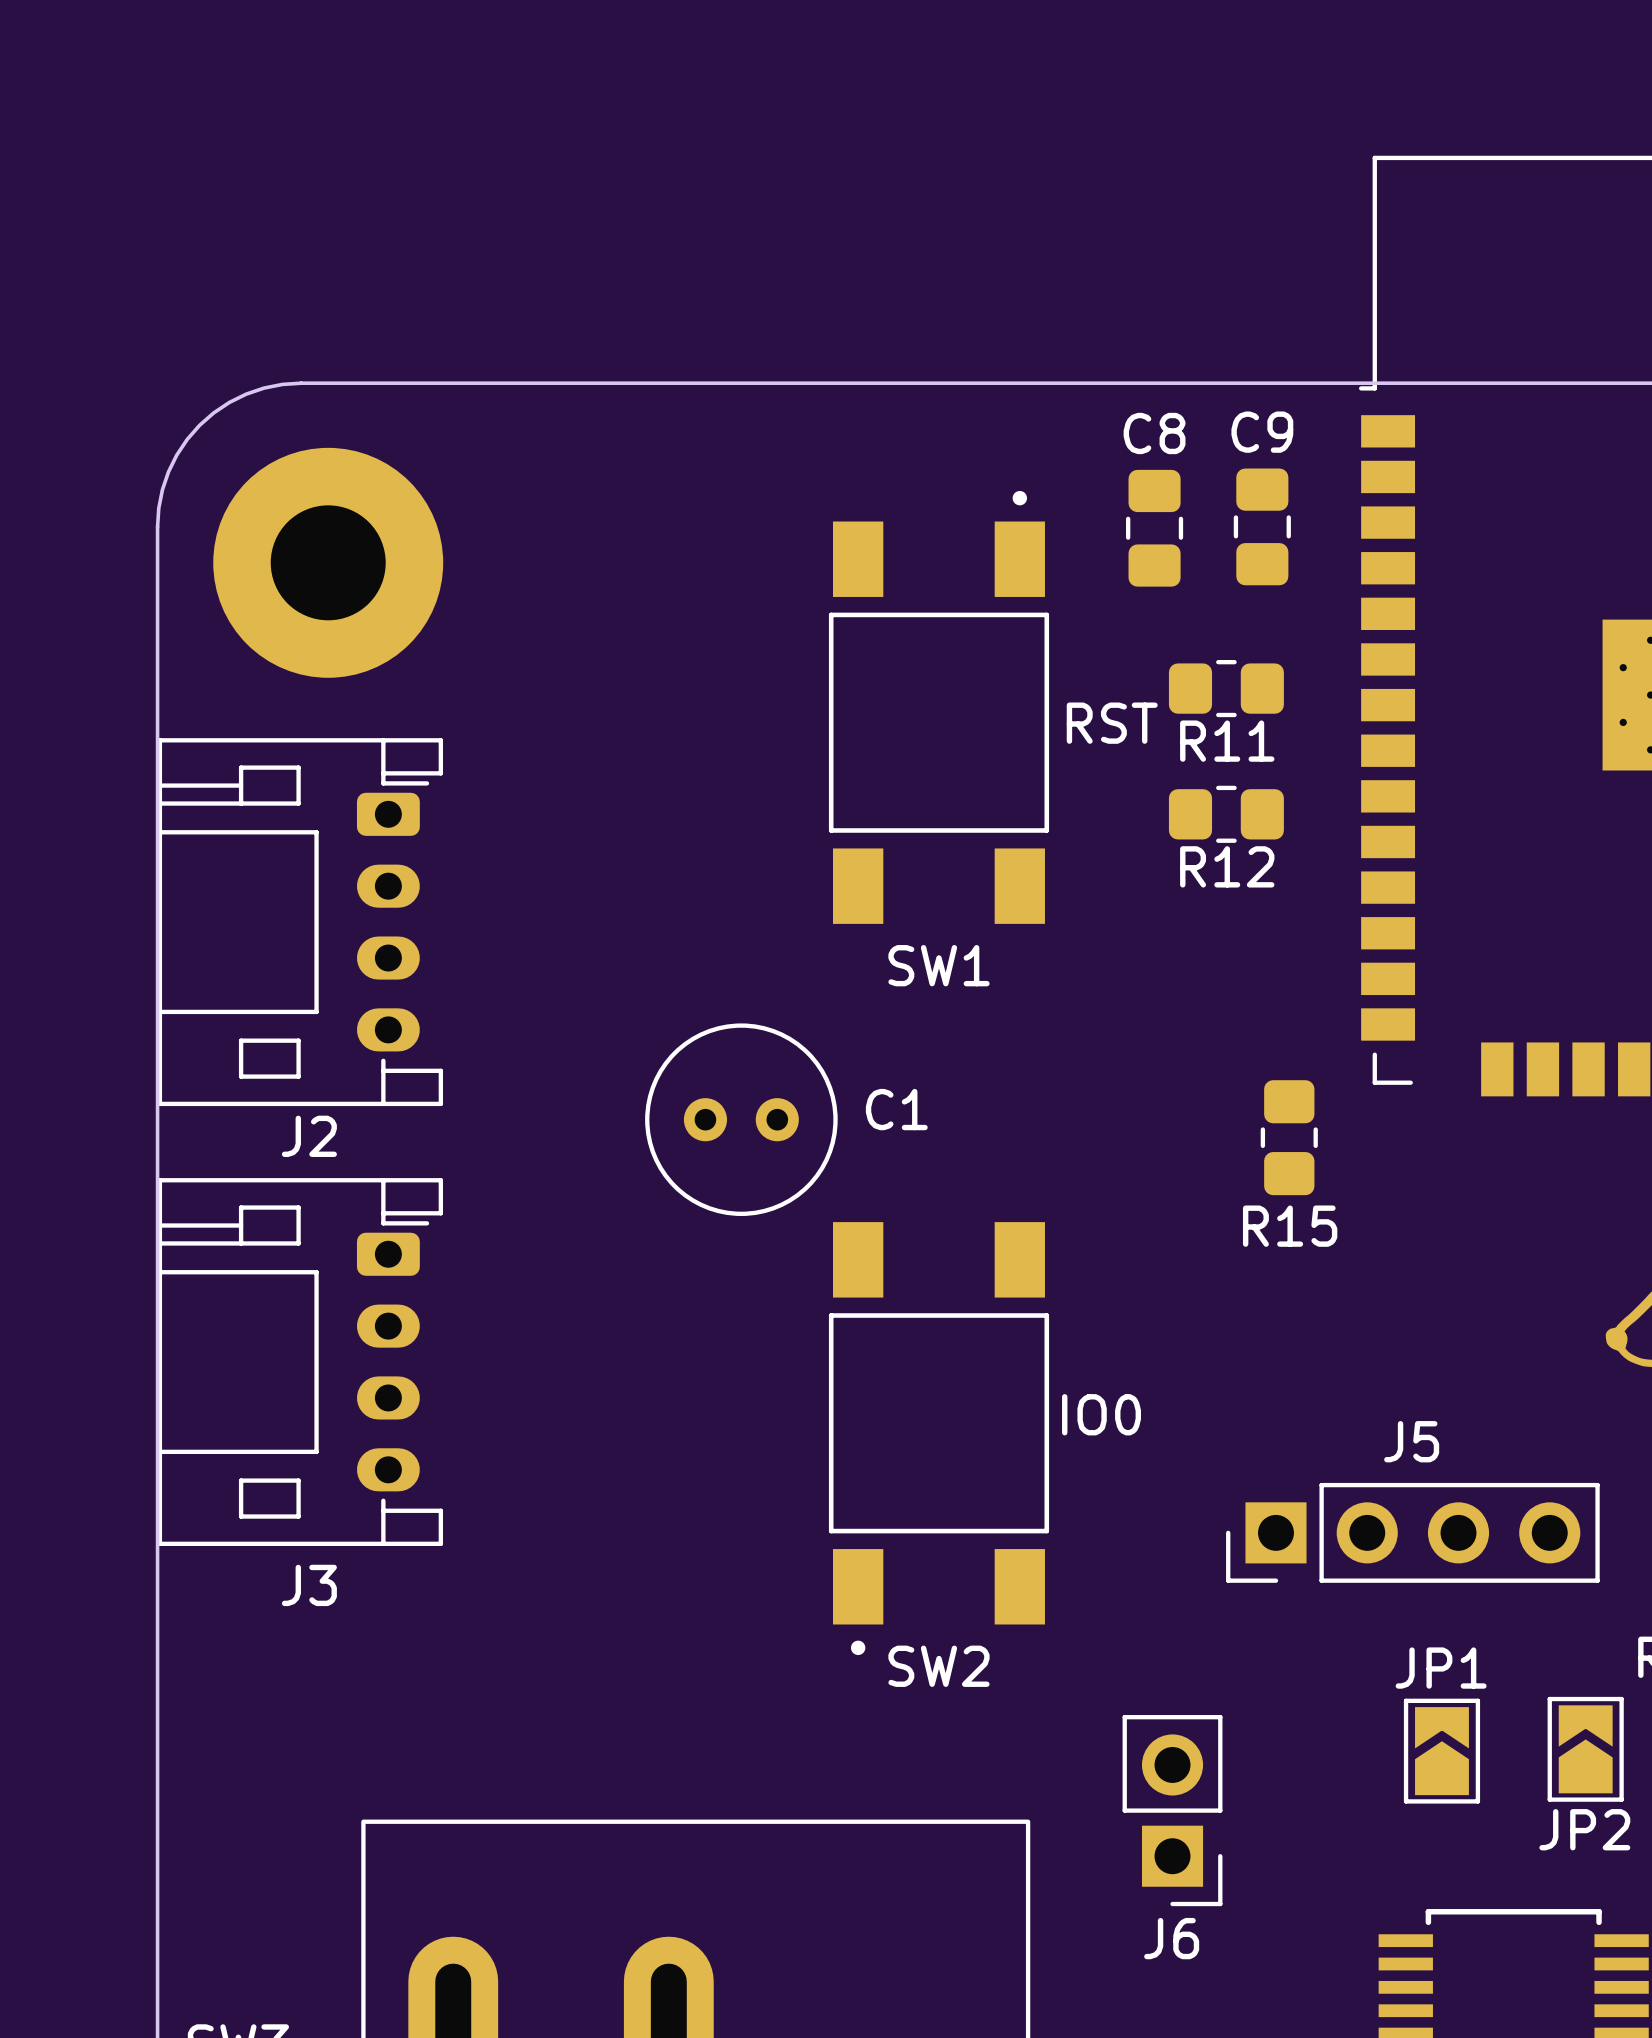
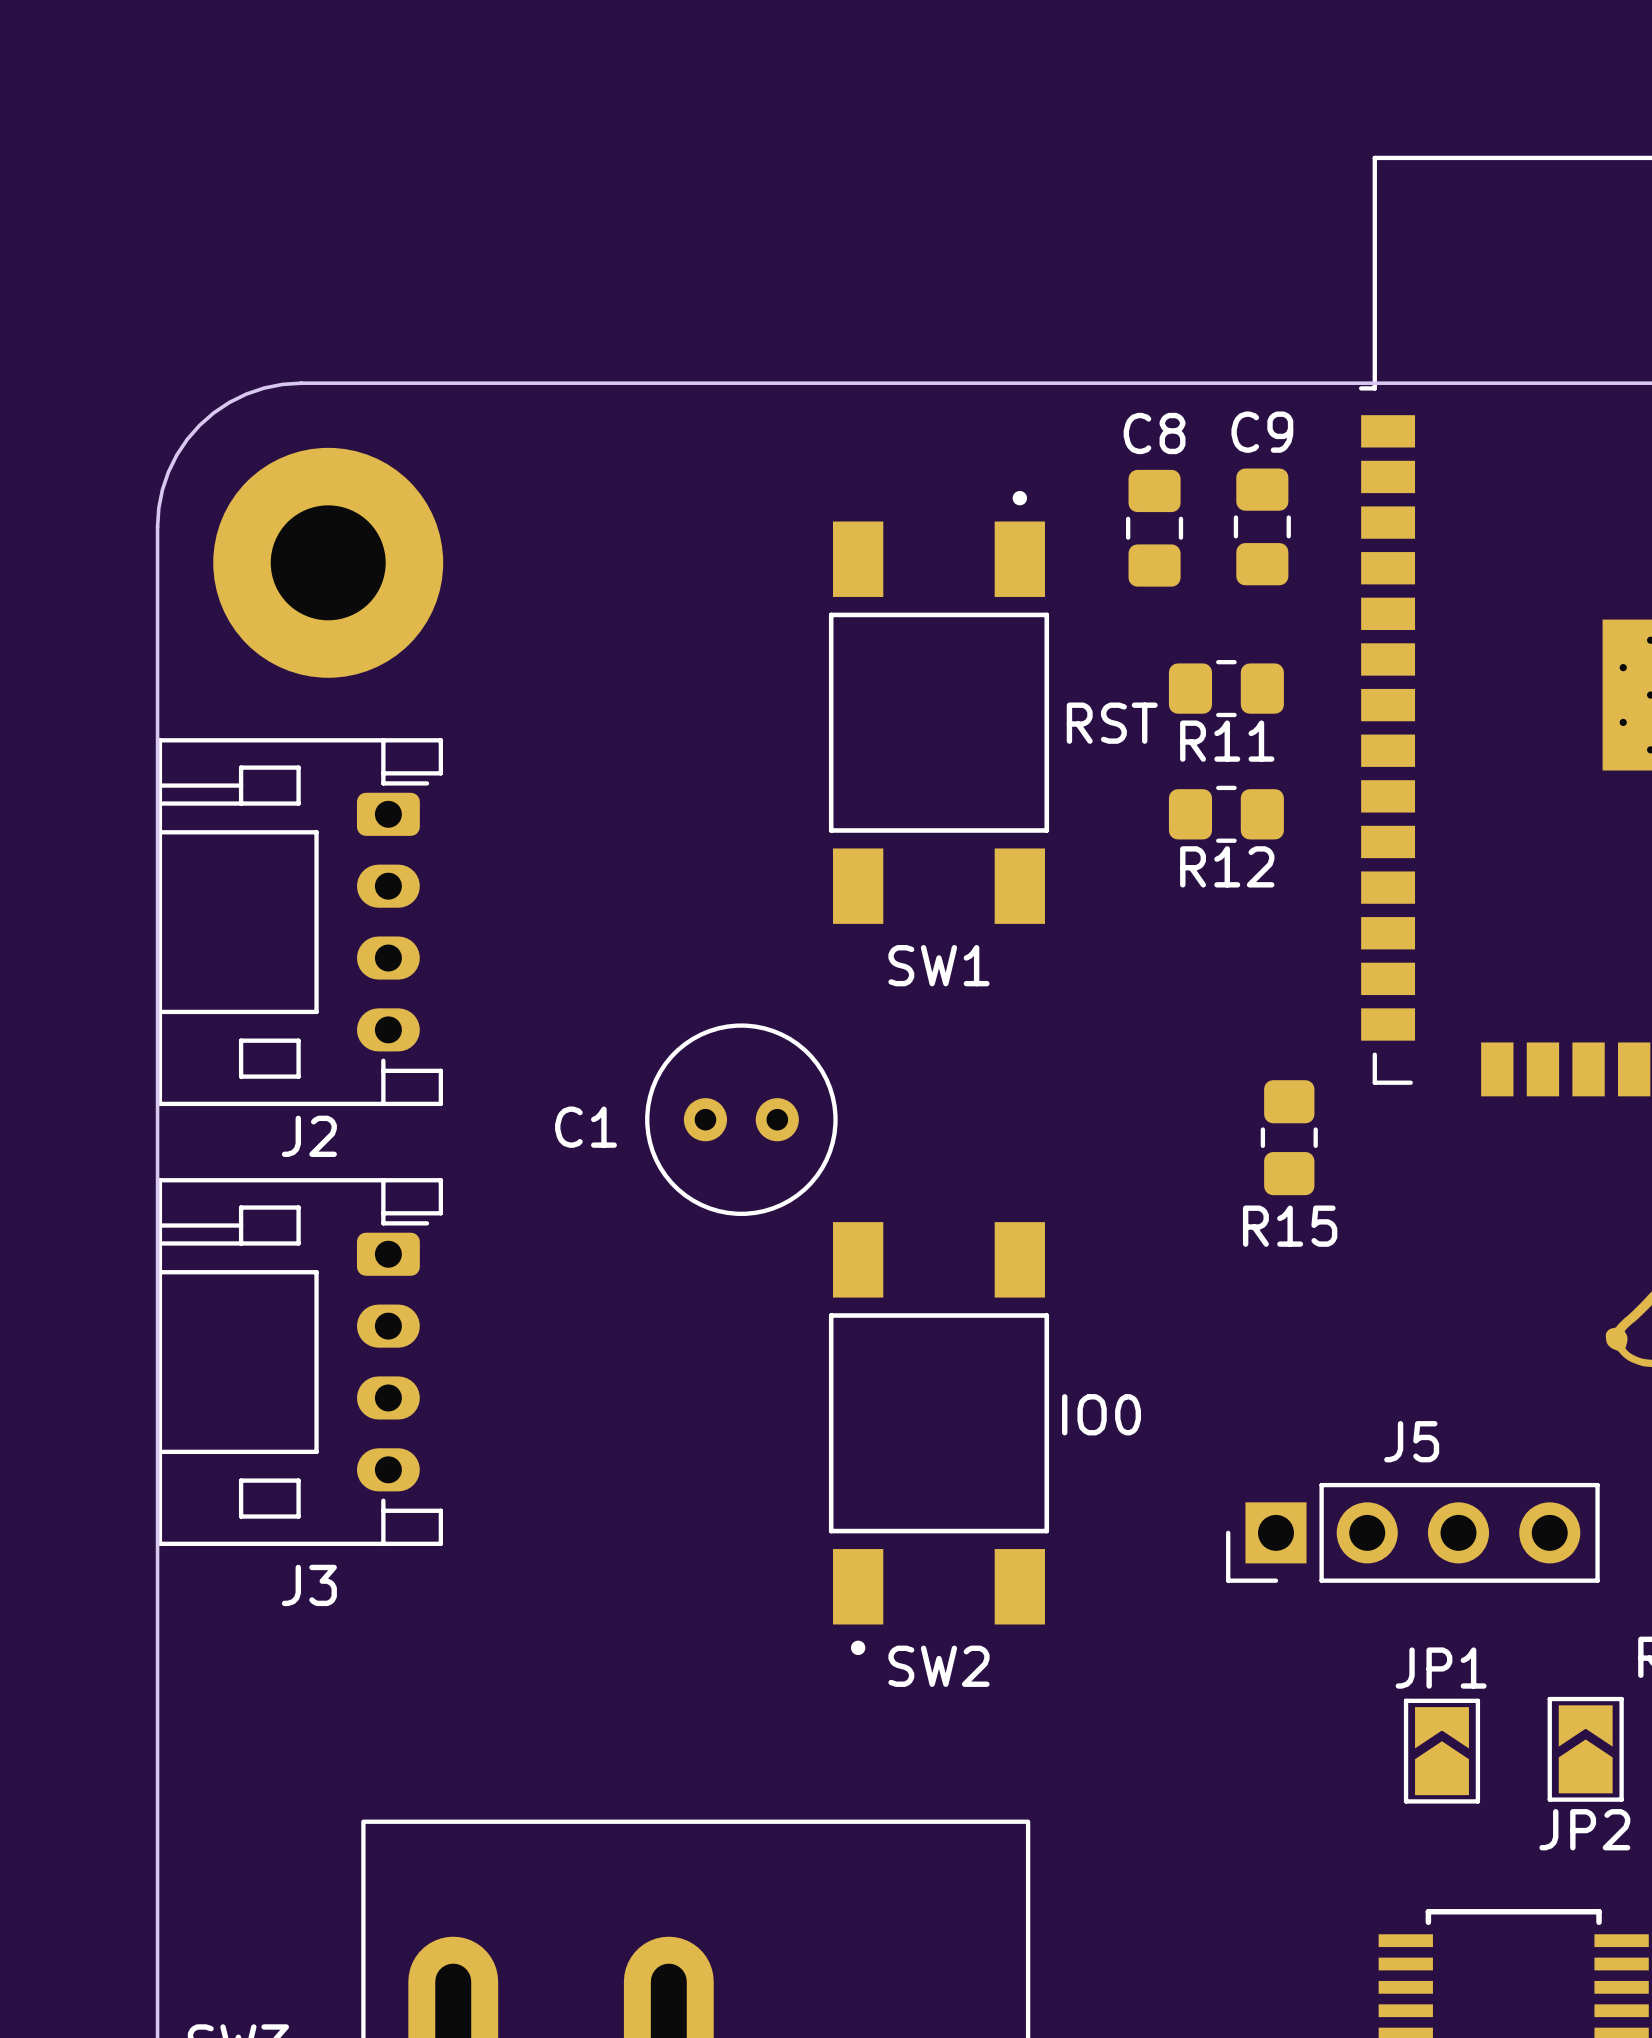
C1 name position: C1 (896, 1109) -> C1 (586, 1127)
J6: (1172, 1810) -> none

